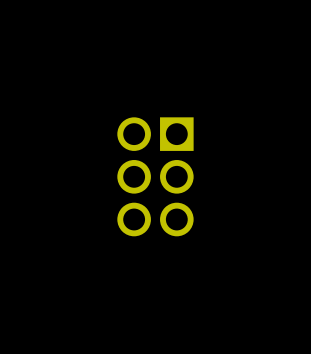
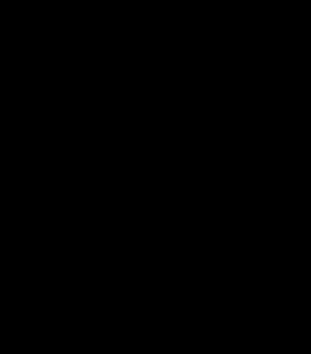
part: (155, 176) -> none

